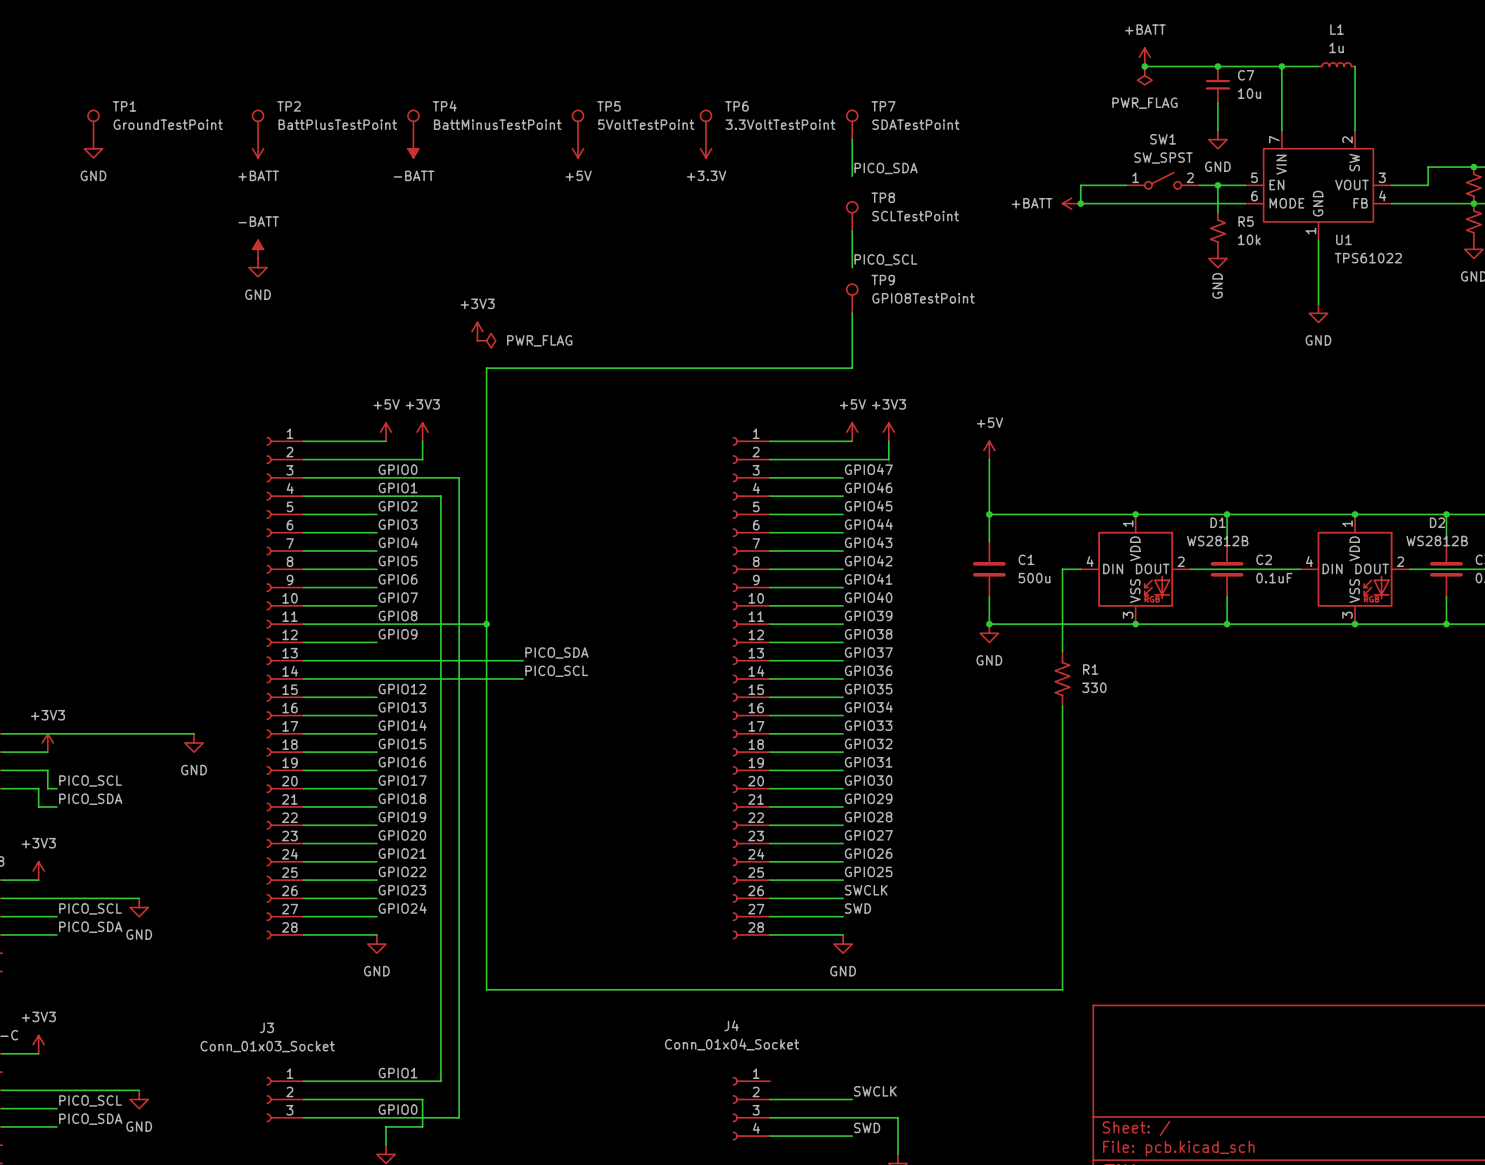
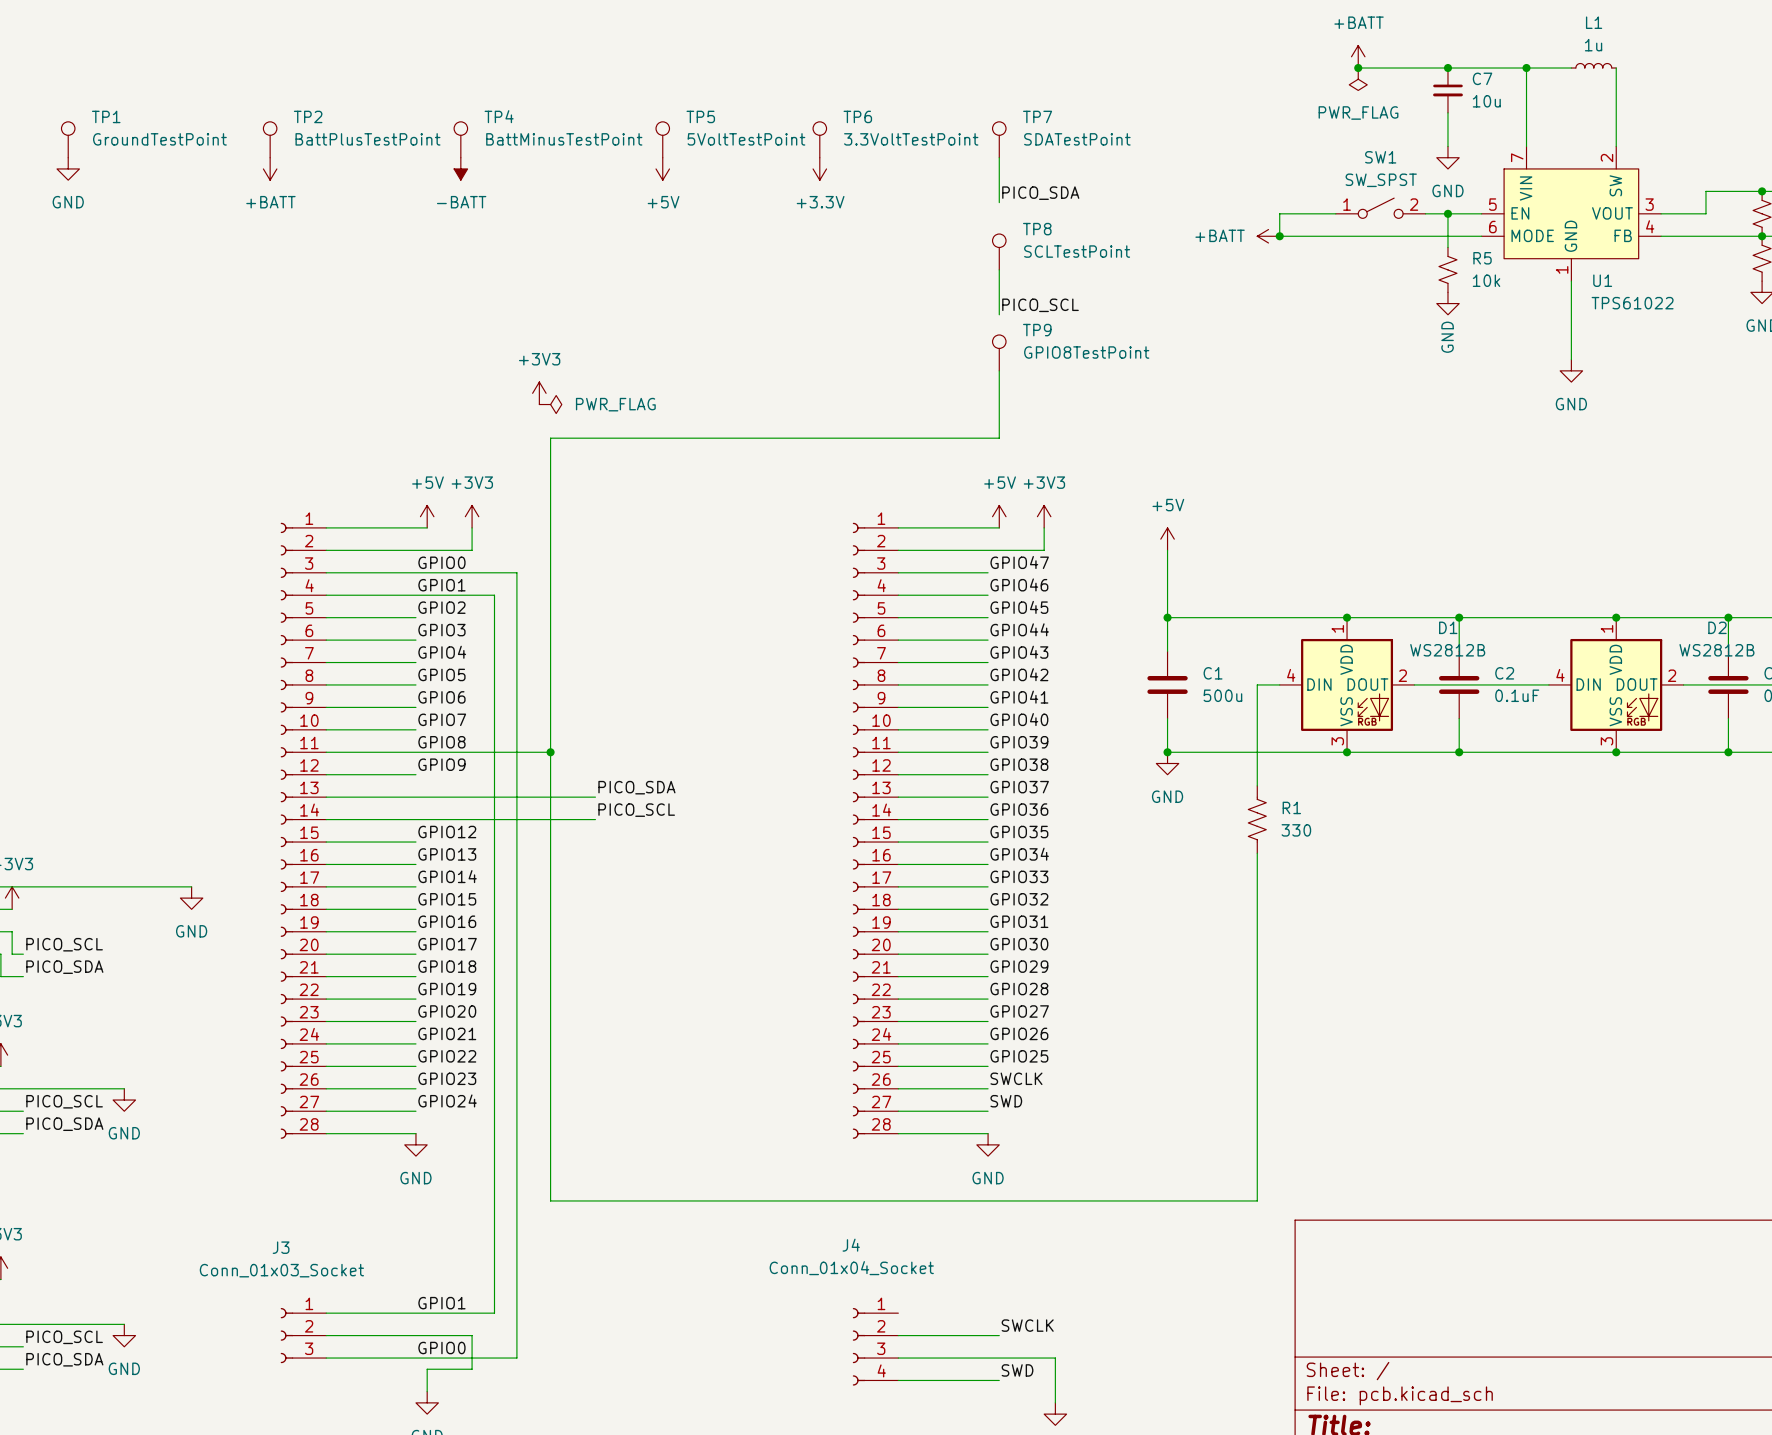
power symbol: -BATT (258, 249) -> none
power symbol: GND (258, 267) -> none

